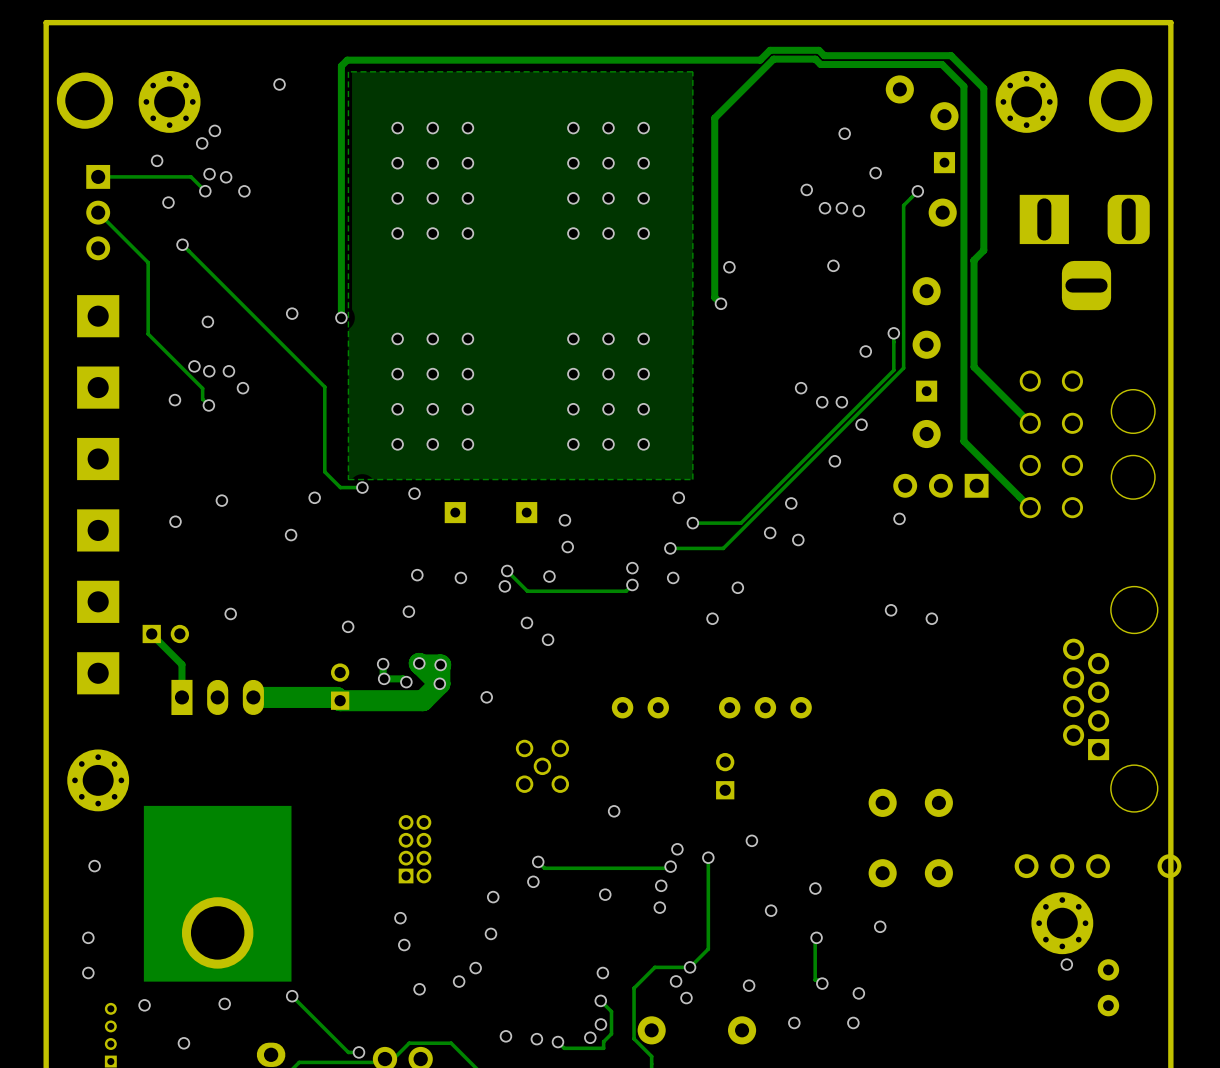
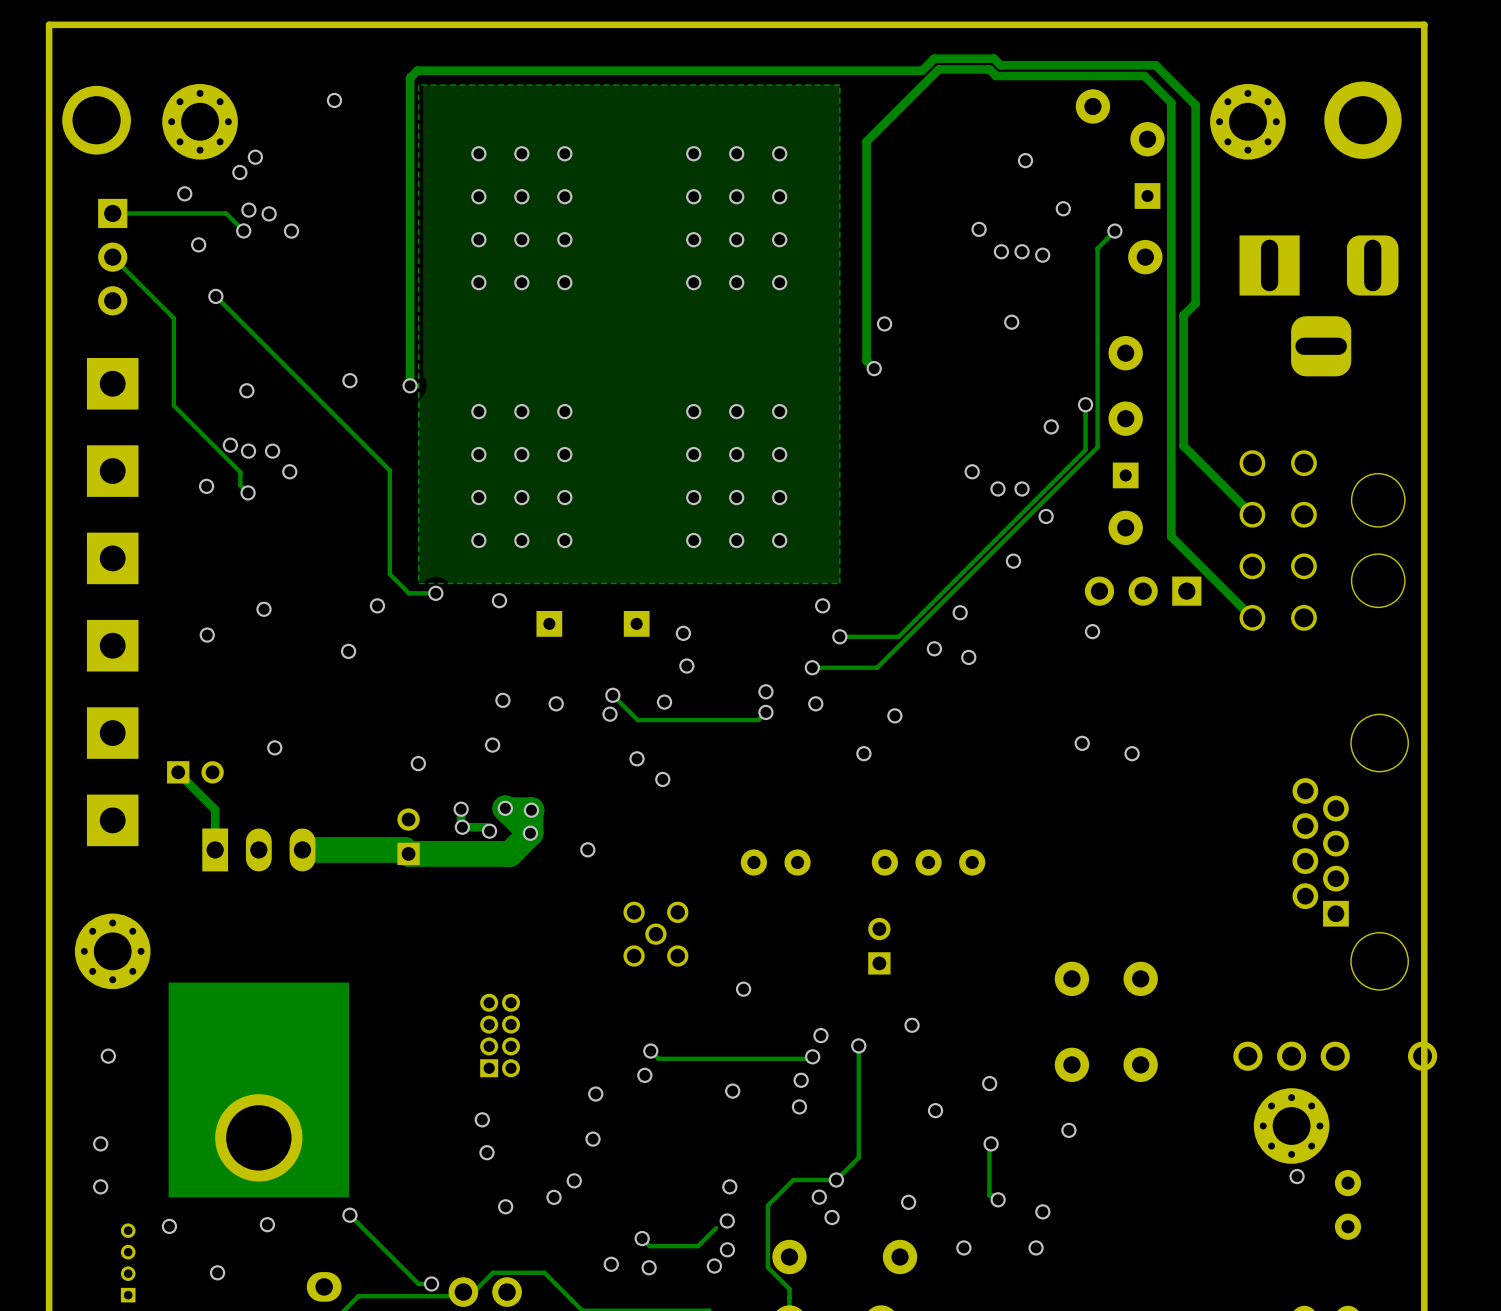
track: (600, 1000) (611, 1011) (611, 1033) (603, 1041) (603, 1048) (564, 1048) (557, 1042) -> none
track: none -> (716, 1228) (698, 1246) (649, 1246) (642, 1238)
via: none -> (642, 1238)
via: (557, 1042) -> none

